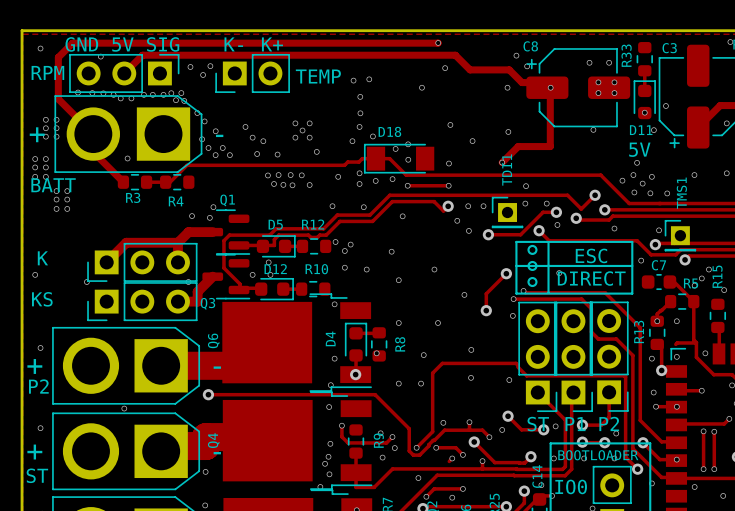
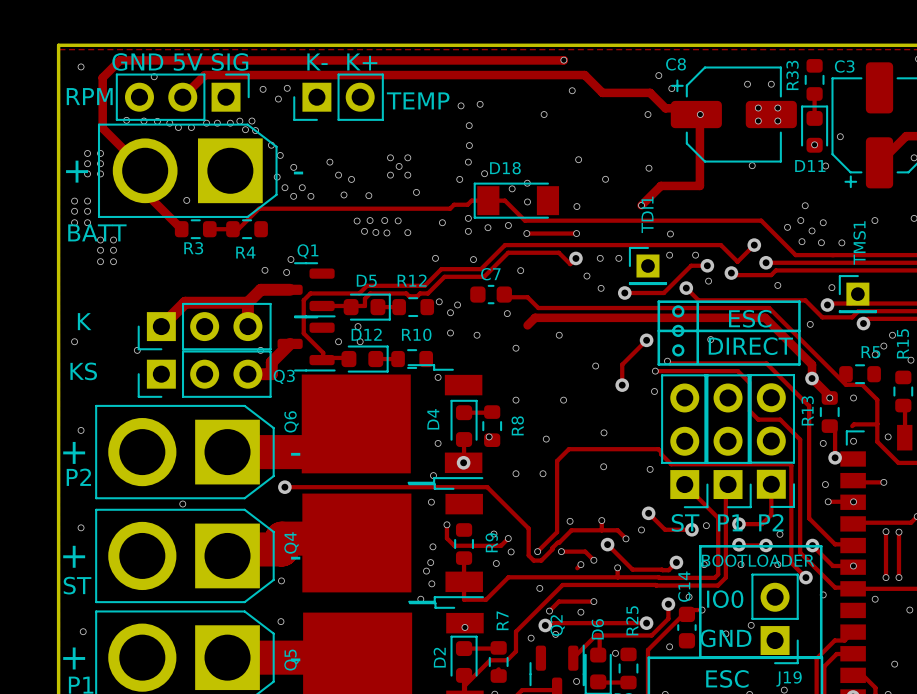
text: 5V (639, 149) -> none
track: none -> (527, 325) (535, 317) (765, 317) (812, 364) (812, 378) (829, 396)
C7 position: (659, 282) -> (491, 294)
track: (669, 282) (674, 282) (693, 301) (693, 339) (696, 342) -> (504, 294) (507, 297) (527, 297) (538, 308) (769, 308) (845, 384) (862, 384) (877, 399) (877, 423)
track: (670, 301) (657, 314) (657, 321) -> none
via: none -> (812, 378)

